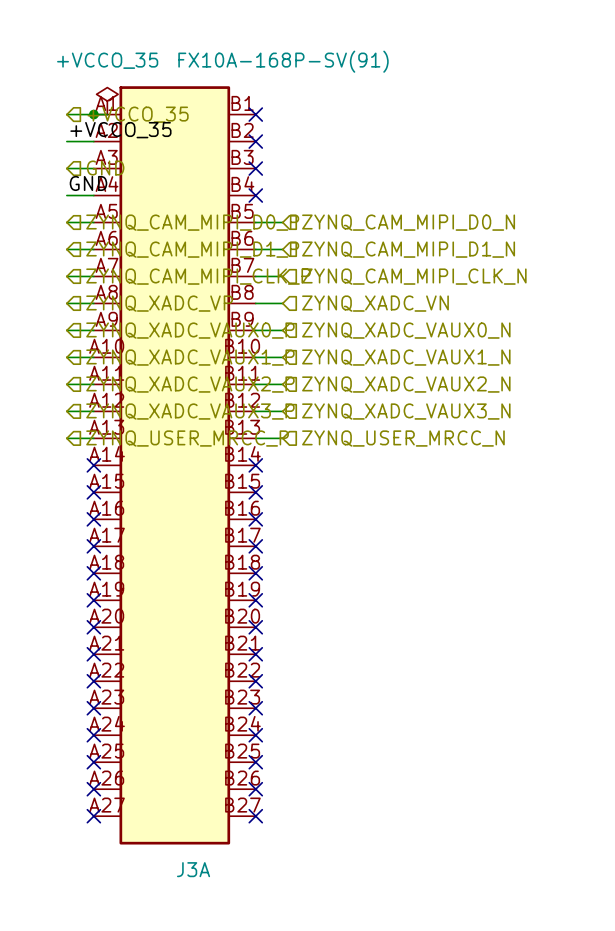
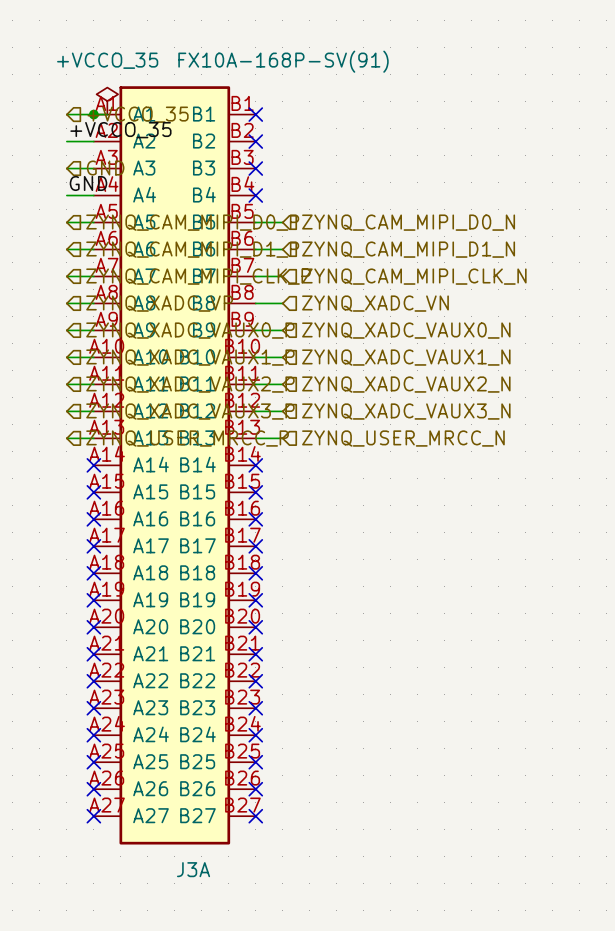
J3A symbol: [93, 86, 256, 845] -> [93, 86, 256, 845]

